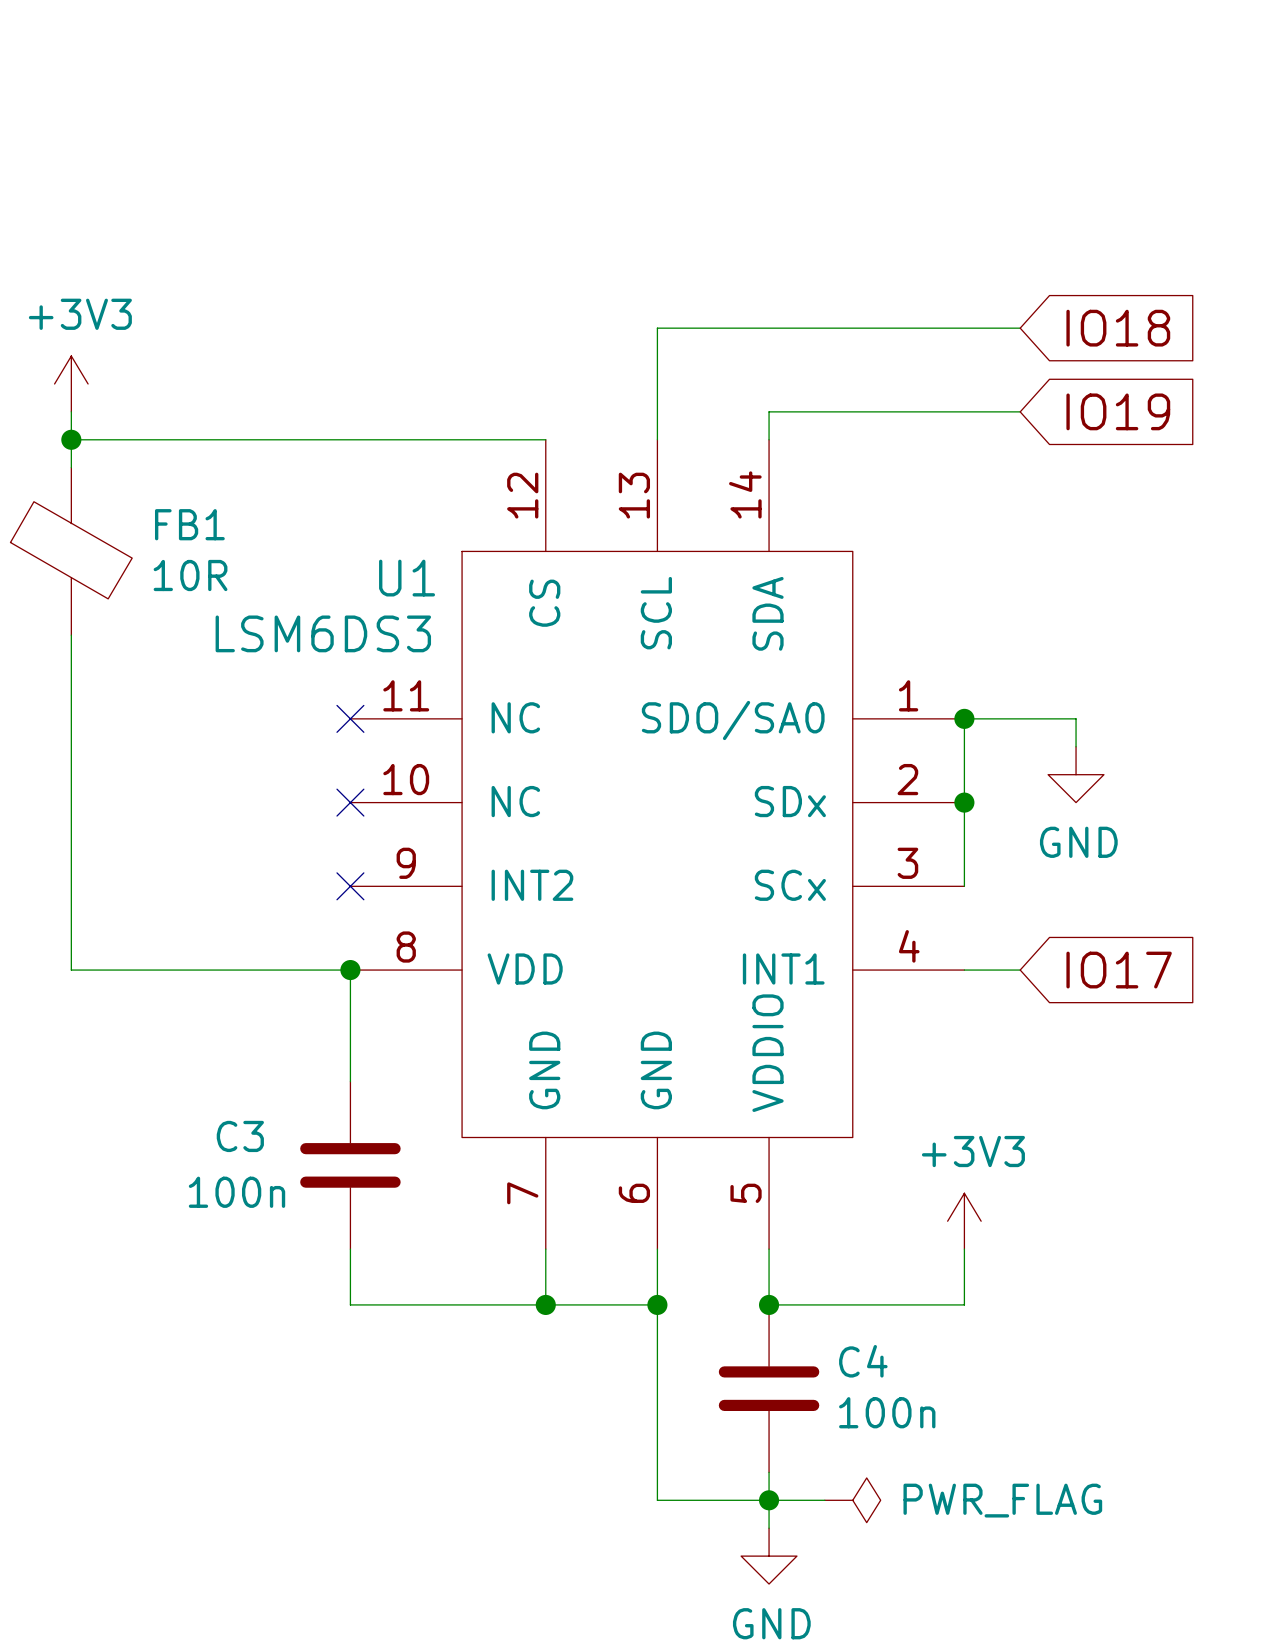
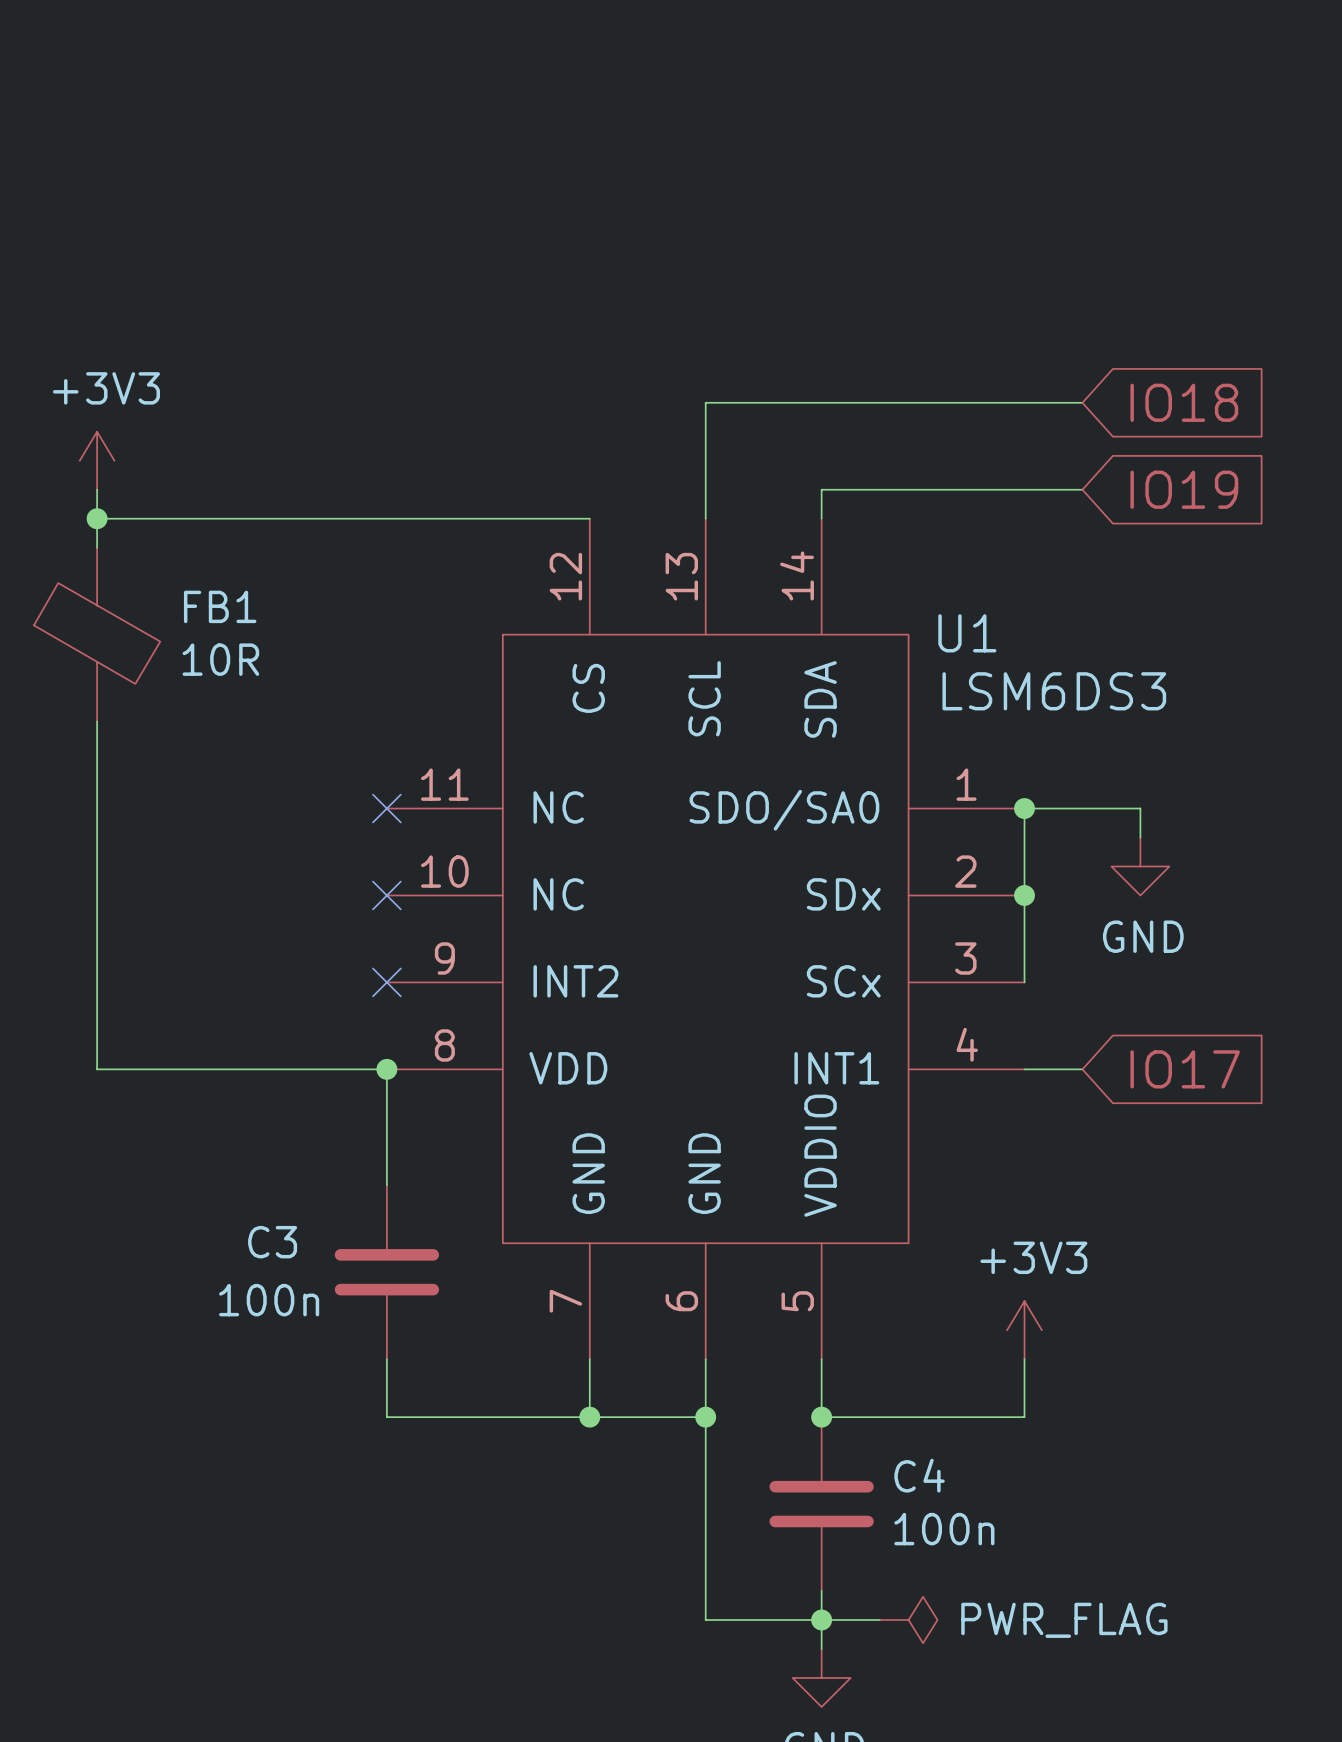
U1 name position: U1 (407, 578) -> U1 (967, 633)
U1 value position: LSM6DS3 (323, 633) -> LSM6DS3 (1054, 691)

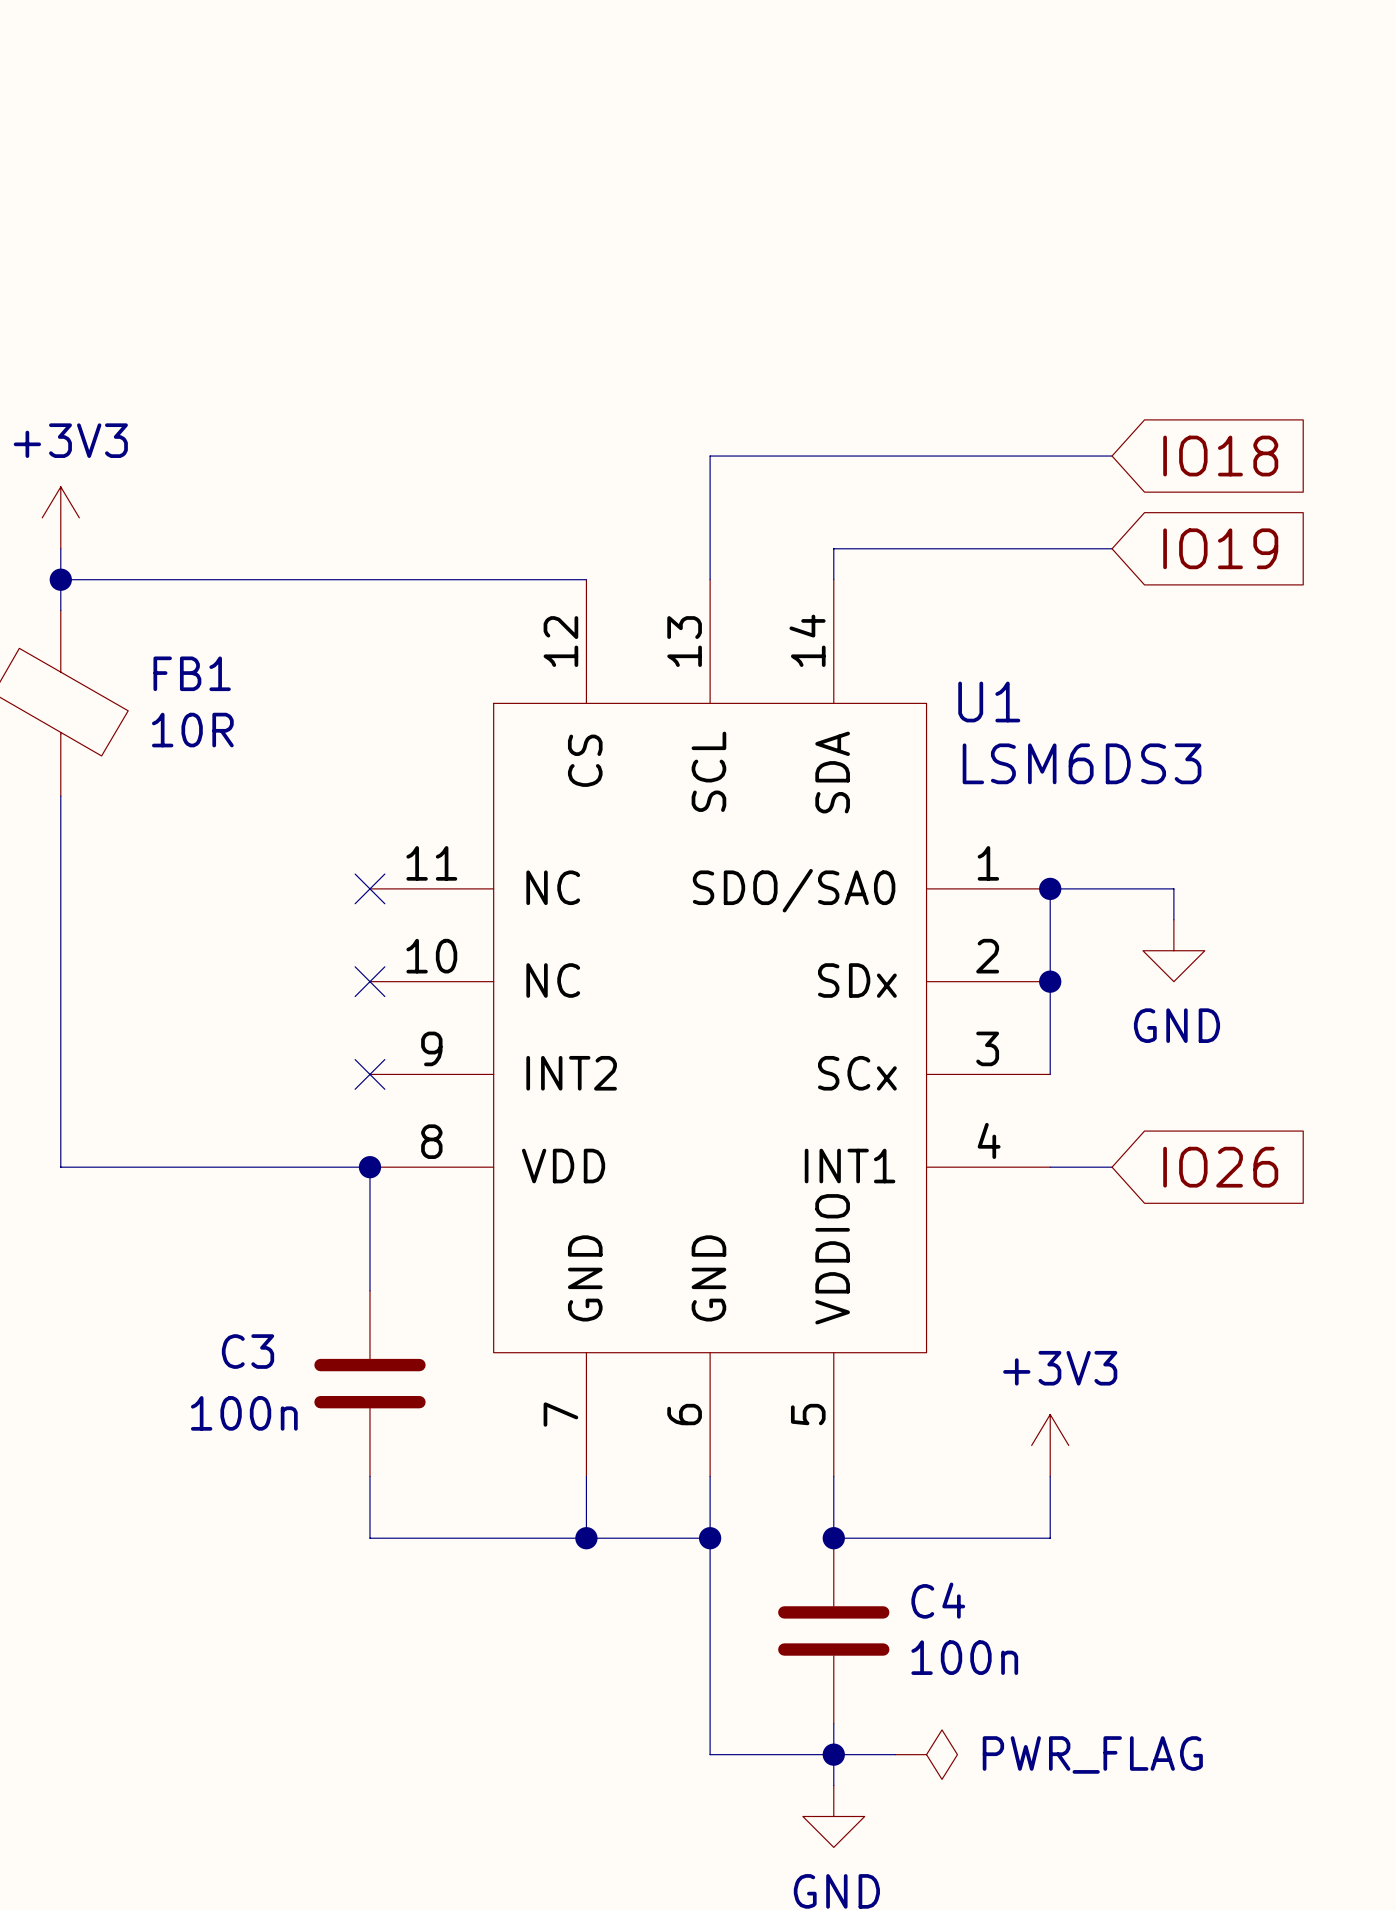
global label: IO17 (1185, 1069) -> IO26 (1220, 1167)

